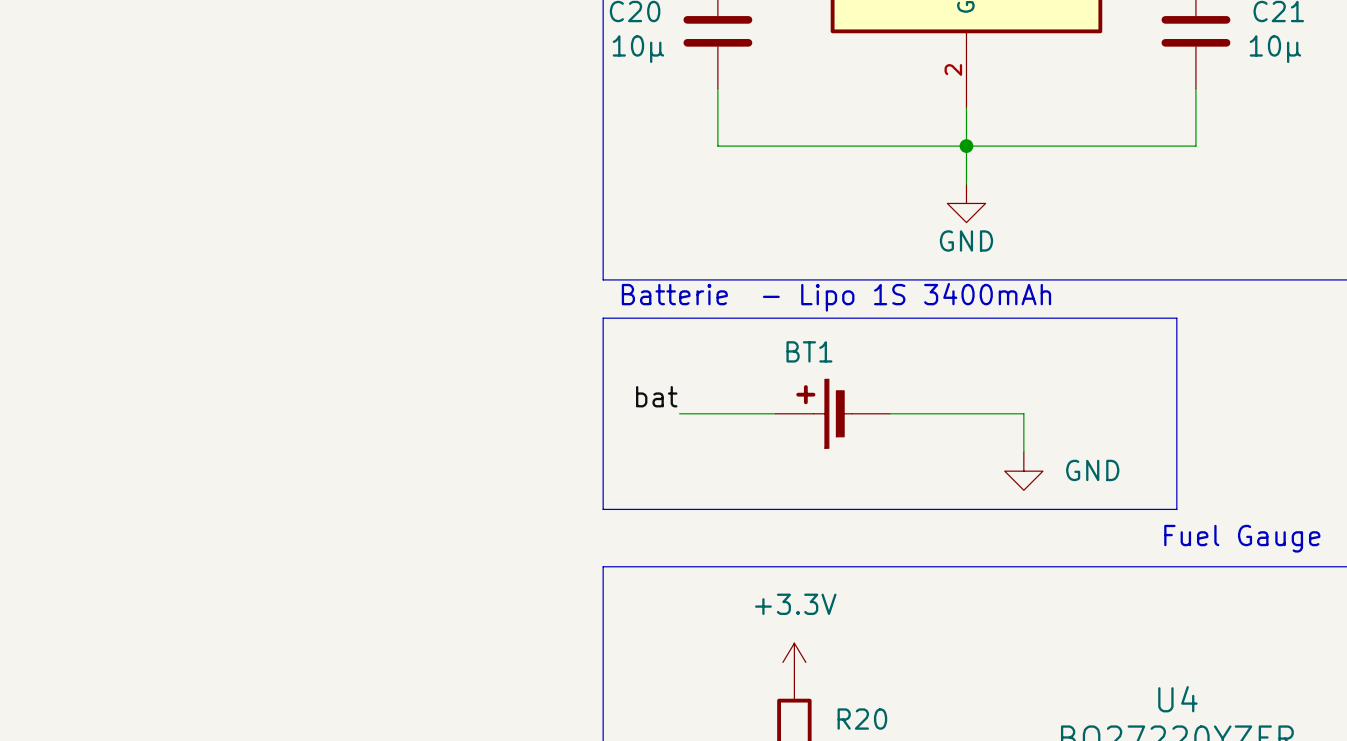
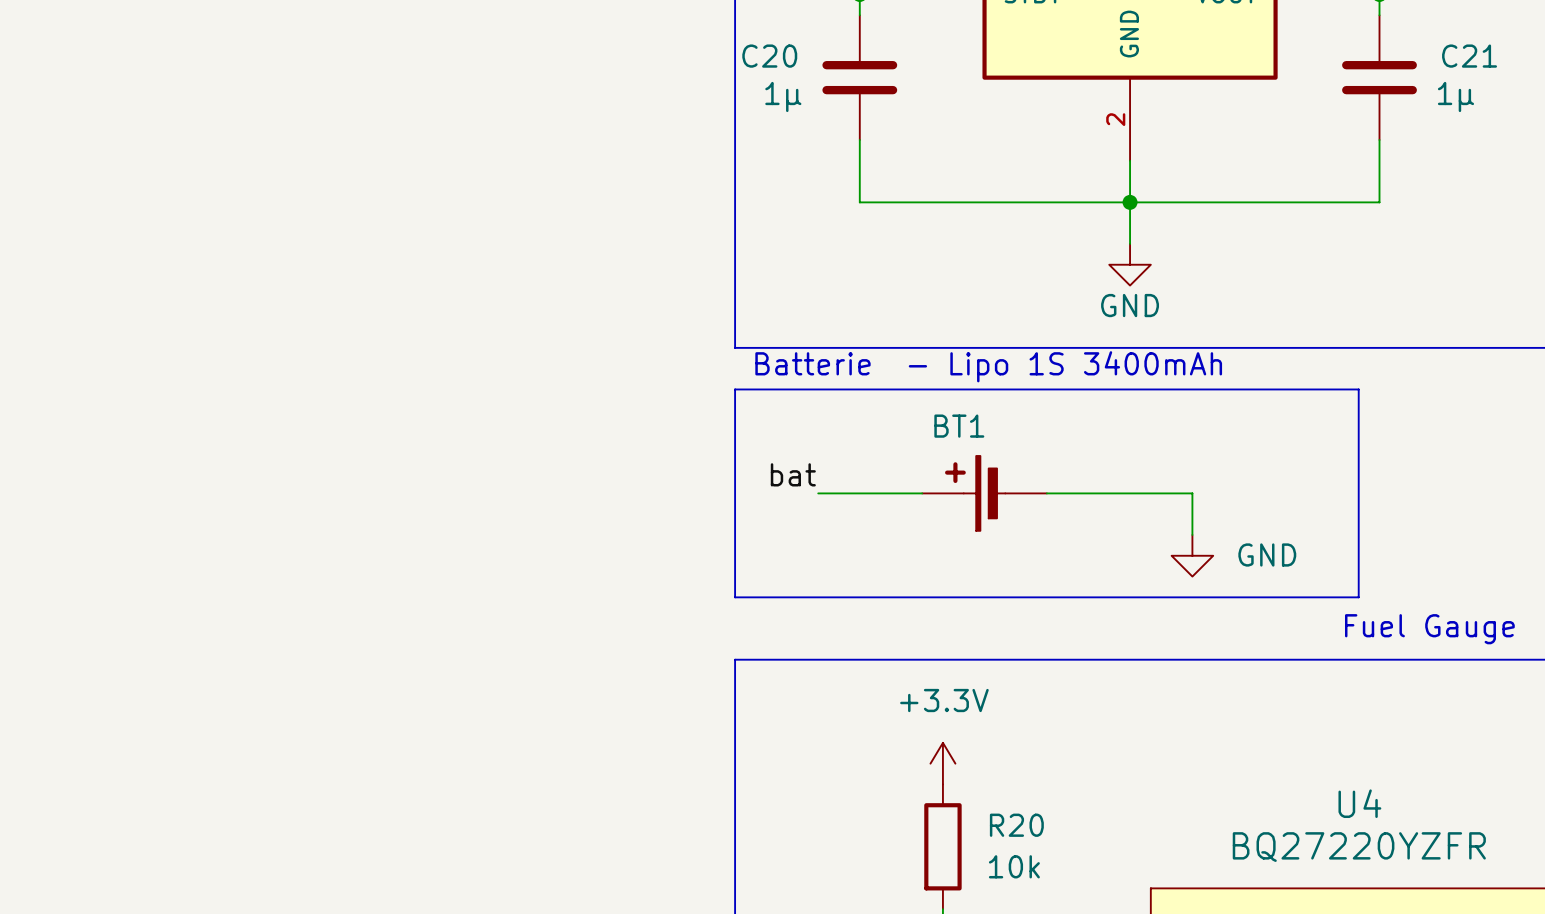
C20 value: 10µ (638, 49) -> 1µ (783, 96)
C21 value: 10µ (1275, 49) -> 1µ (1455, 96)

